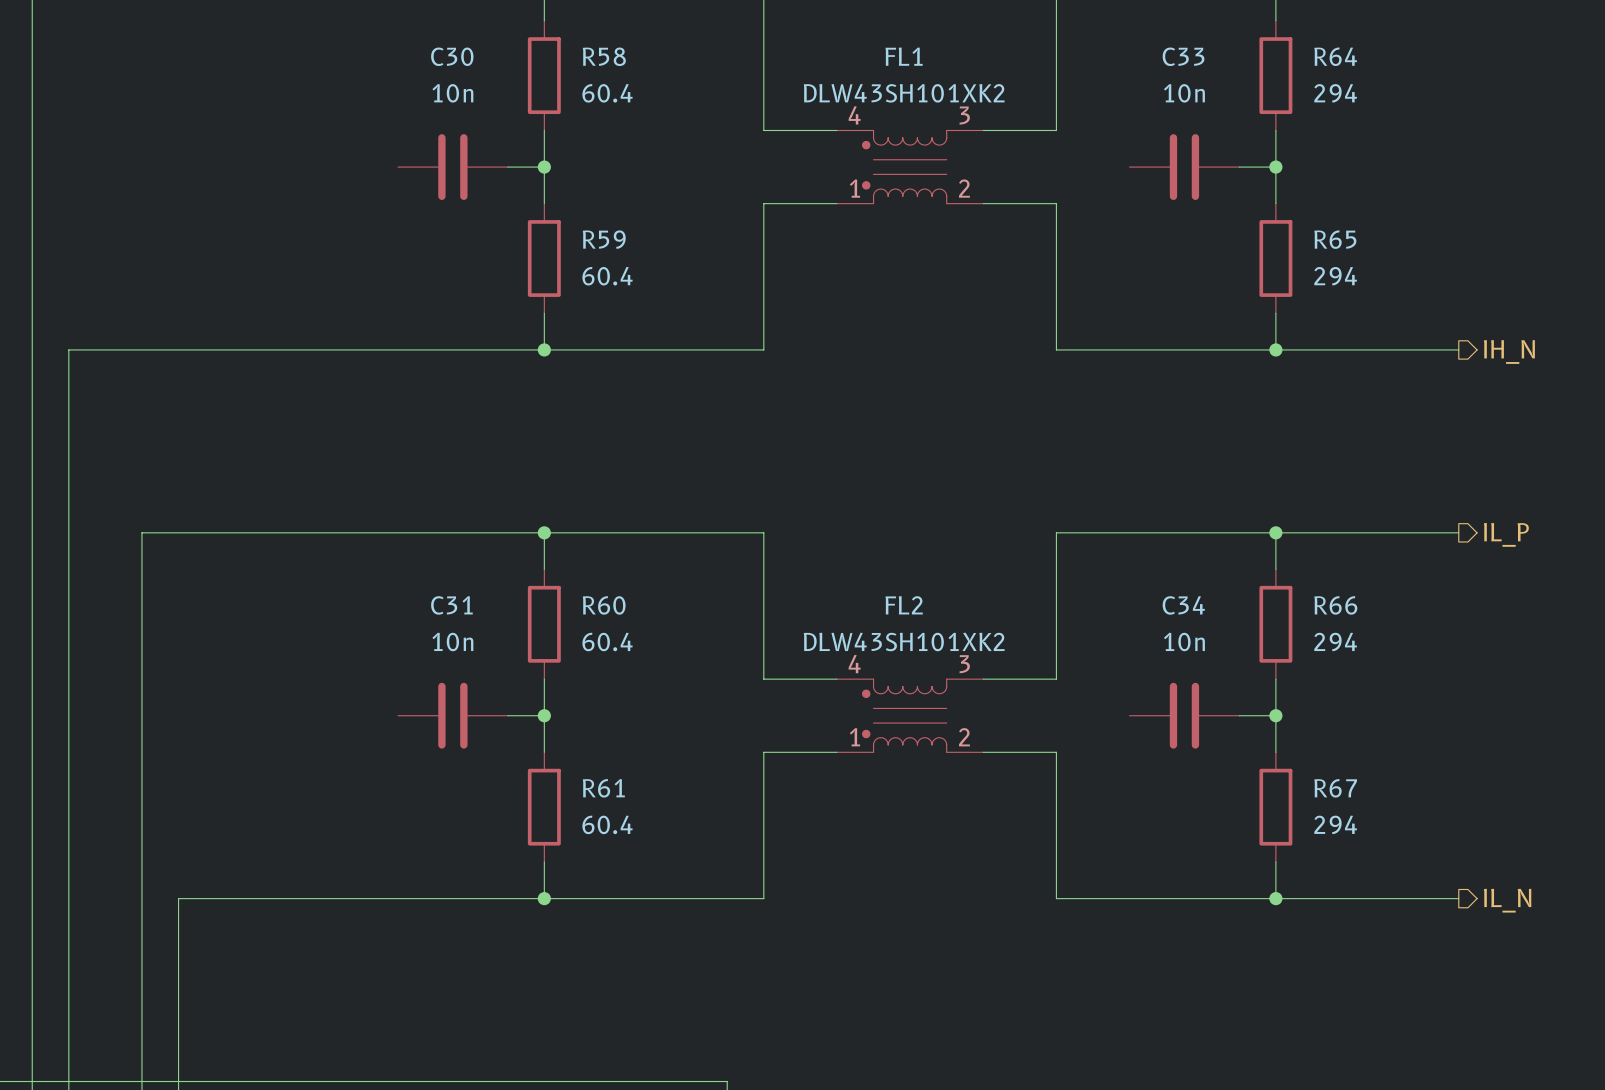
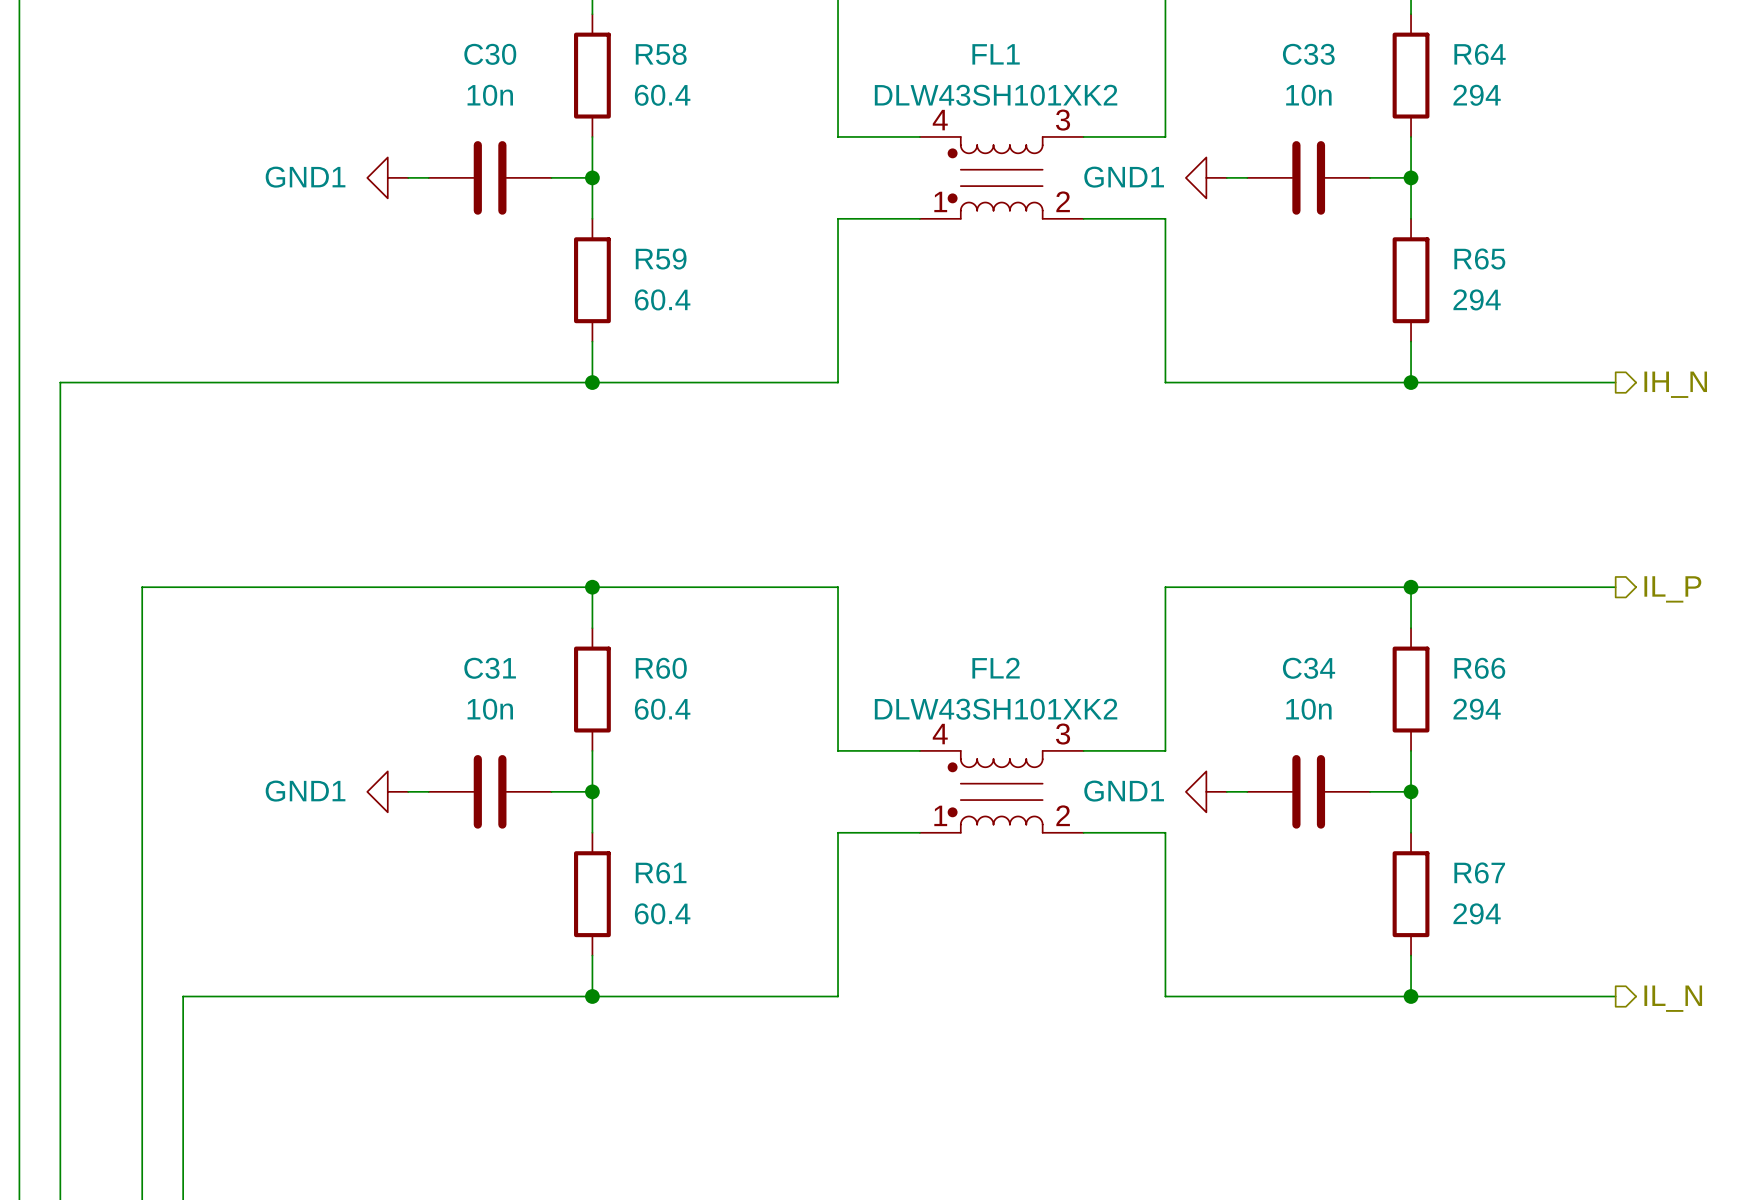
power symbol: none -> GND1 (387, 177)
wire: none -> (408, 177) (428, 177)
power symbol: none -> GND1 (1206, 177)
wire: none -> (1226, 177) (1247, 177)
power symbol: none -> GND1 (387, 791)
wire: none -> (408, 791) (428, 791)
power symbol: none -> GND1 (1206, 791)
wire: none -> (1226, 791) (1247, 791)

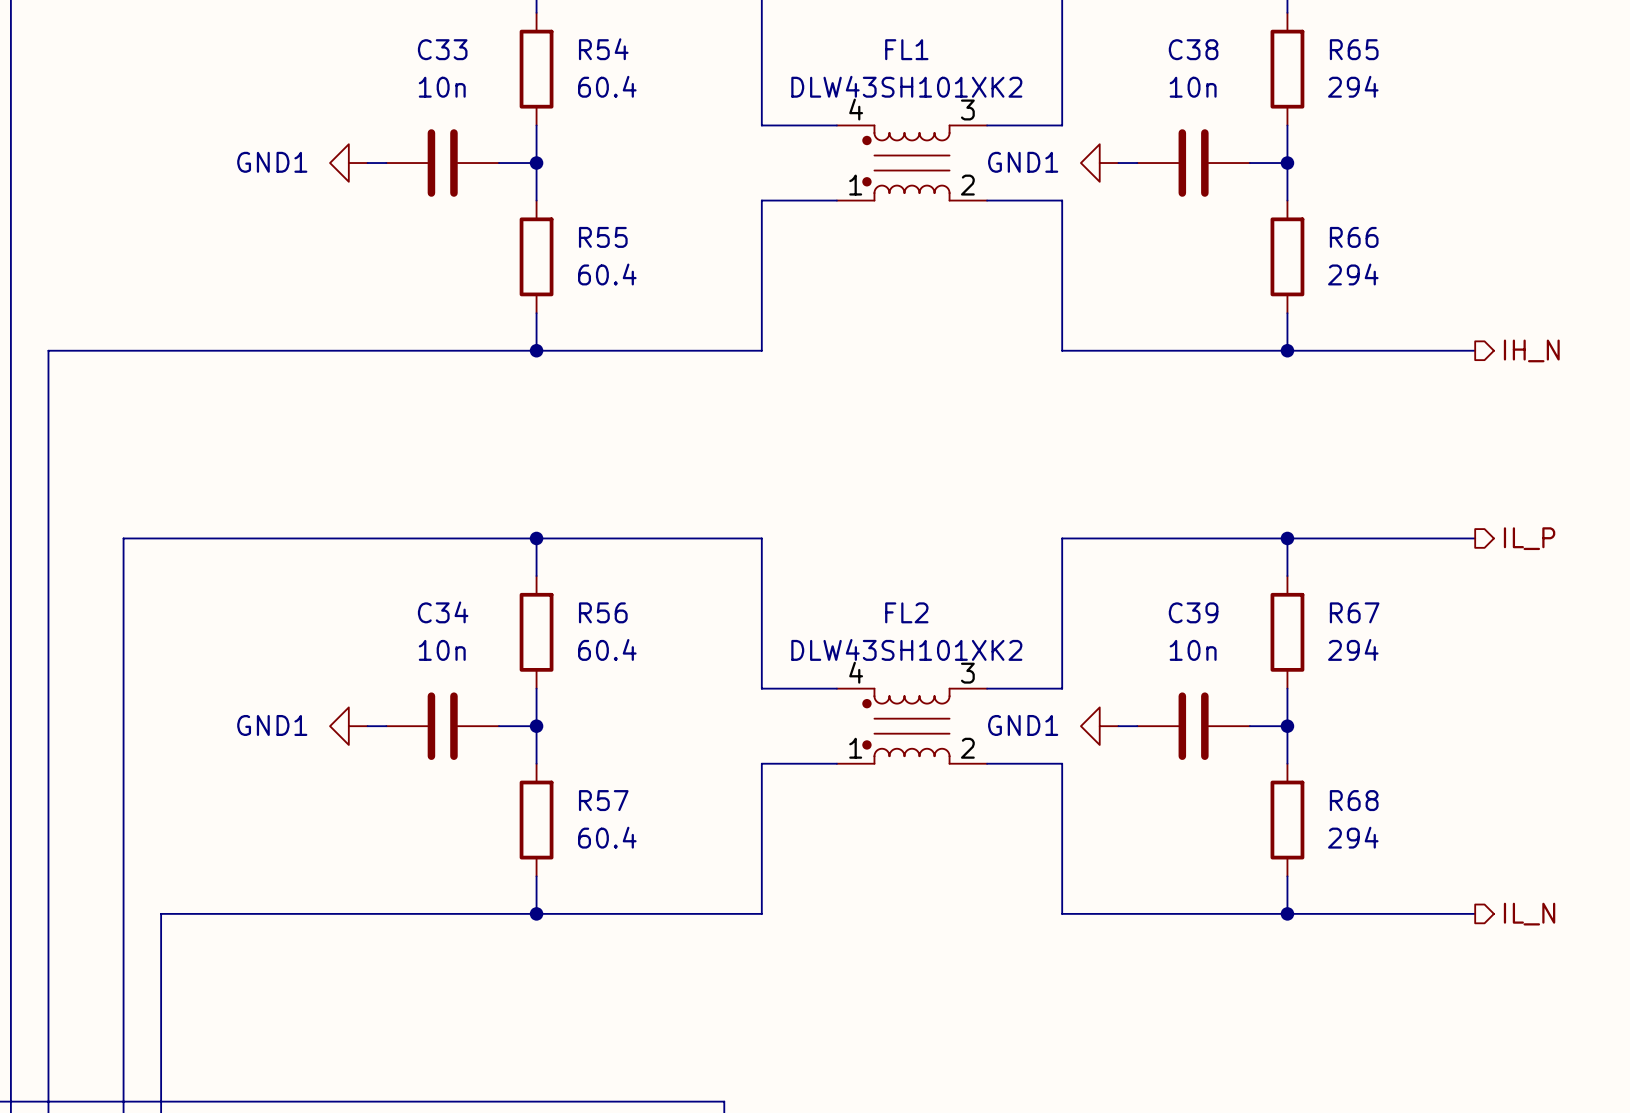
C30 name: C30 (490, 54) -> C33 (442, 49)
R58 name: R58 (661, 54) -> R54 (603, 49)
C33 name: C33 (1308, 54) -> C38 (1193, 49)
R64 name: R64 (1480, 54) -> R65 (1354, 49)
R59 name: R59 (661, 258) -> R55 (603, 237)
R65 name: R65 (1479, 258) -> R66 (1354, 237)
C31 name: C31 (490, 668) -> C34 (443, 612)
R60 name: R60 (661, 668) -> R56 (603, 612)
C34 name: C34 (1309, 668) -> C39 (1193, 612)
R66 name: R66 (1479, 668) -> R67 (1354, 612)
R61 name: R61 (661, 872) -> R57 (603, 800)
R67 name: R67 (1479, 872) -> R68 (1354, 800)

